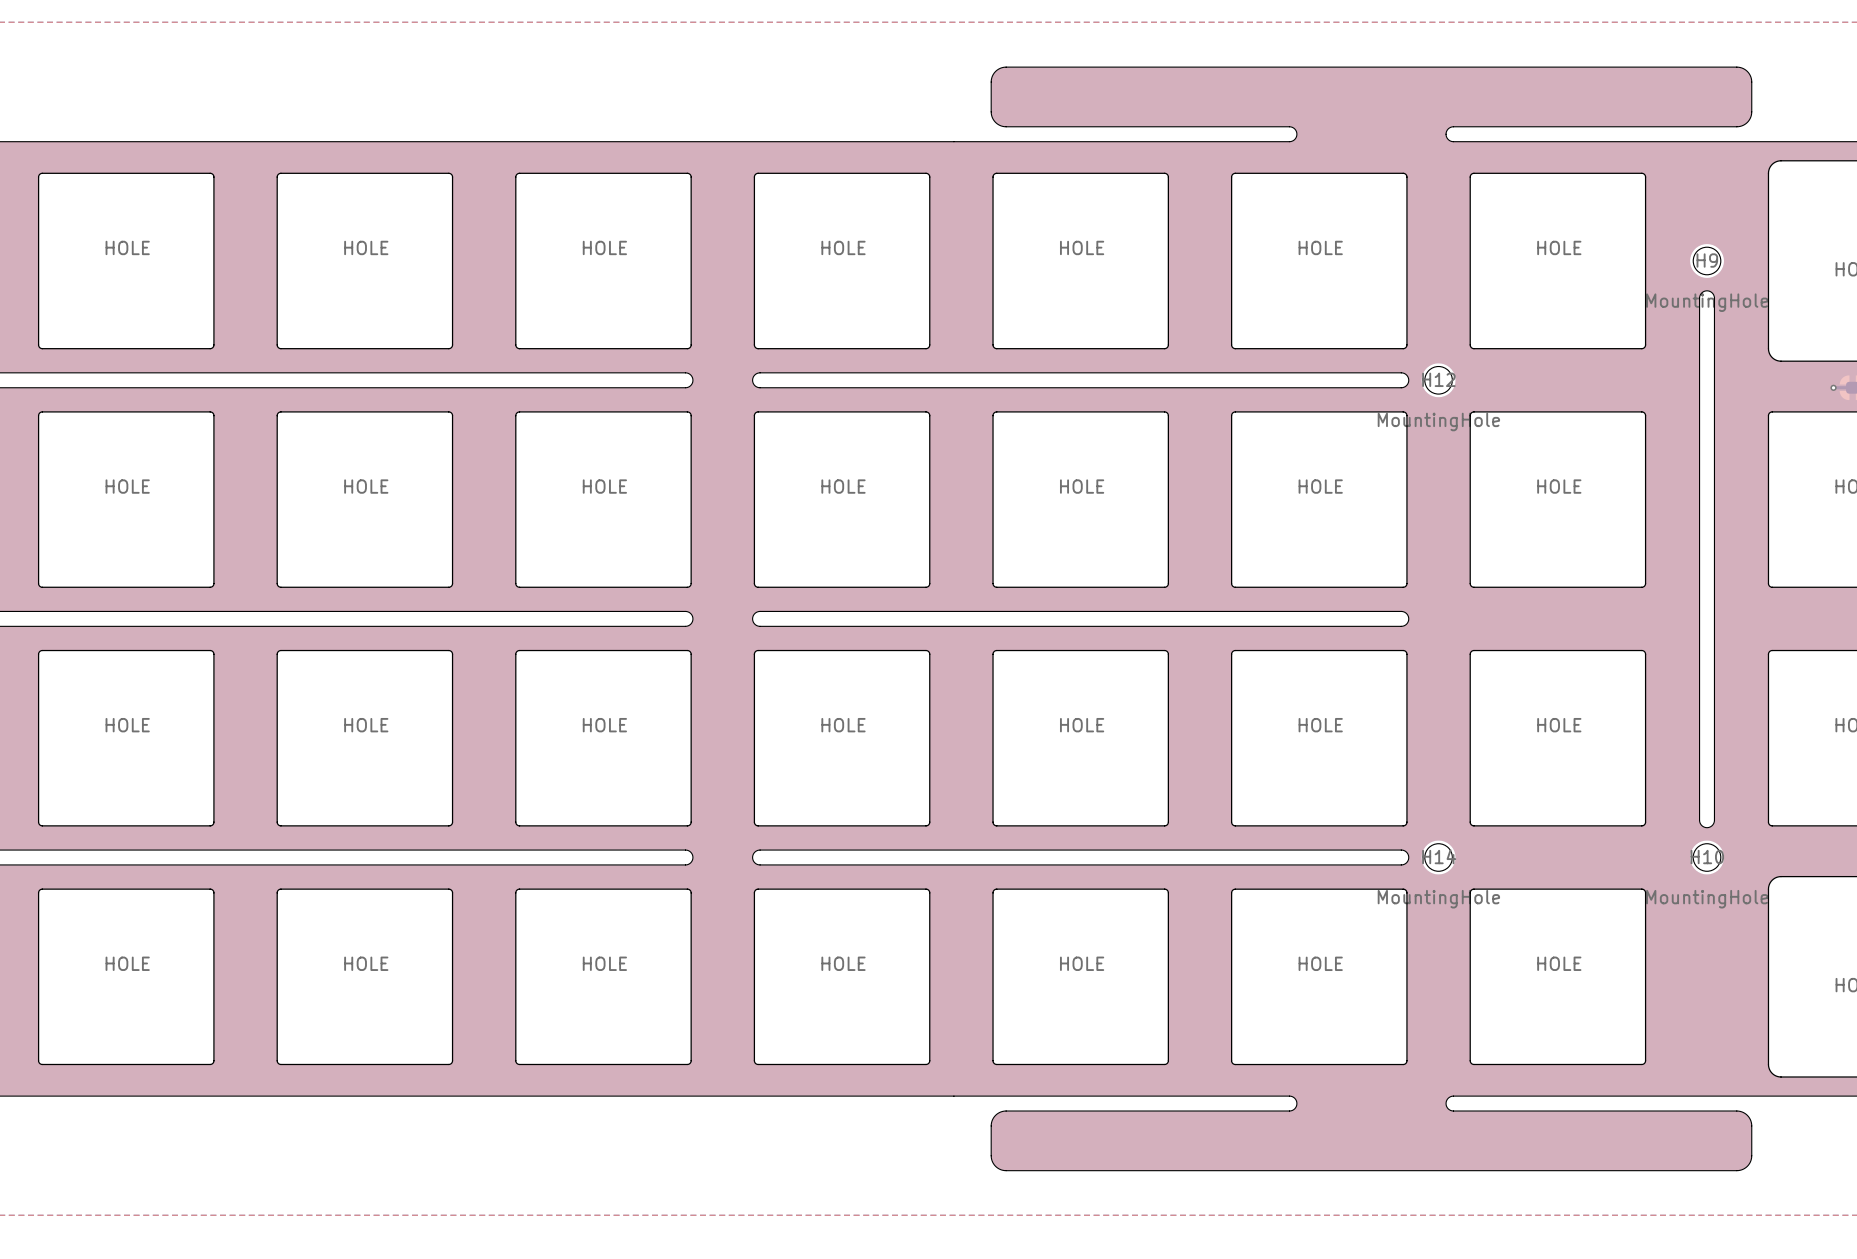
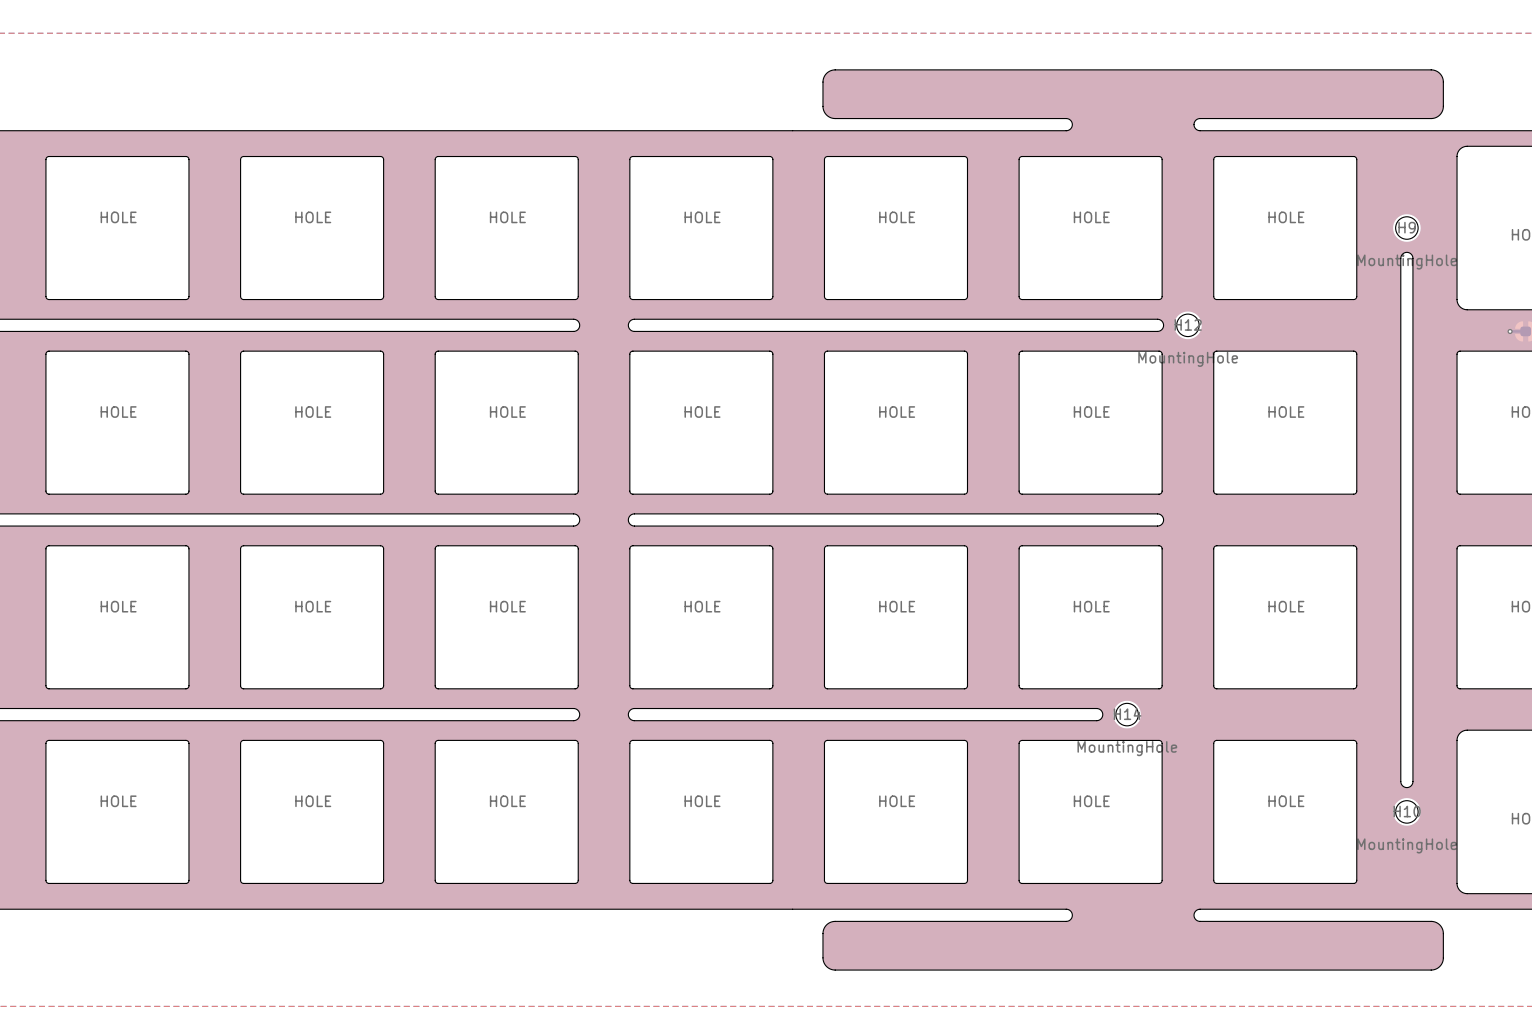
board edge: (1699, 820) (1702, 825) (1707, 827) (1712, 825) (1714, 820) -> (1400, 684) (1400, 781) (1402, 785) (1406, 787) (1411, 785) (1412, 781) (1412, 684)
board edge: (1326, 850) (1402, 850) (1406, 852) (1408, 857) (1406, 862) (1402, 864) (1326, 864) -> (1096, 708) (1100, 710) (1102, 714) (1100, 718) (1096, 720)
H14 position: (1438, 857) -> (1127, 714)
H10 position: (1707, 857) -> (1406, 811)

